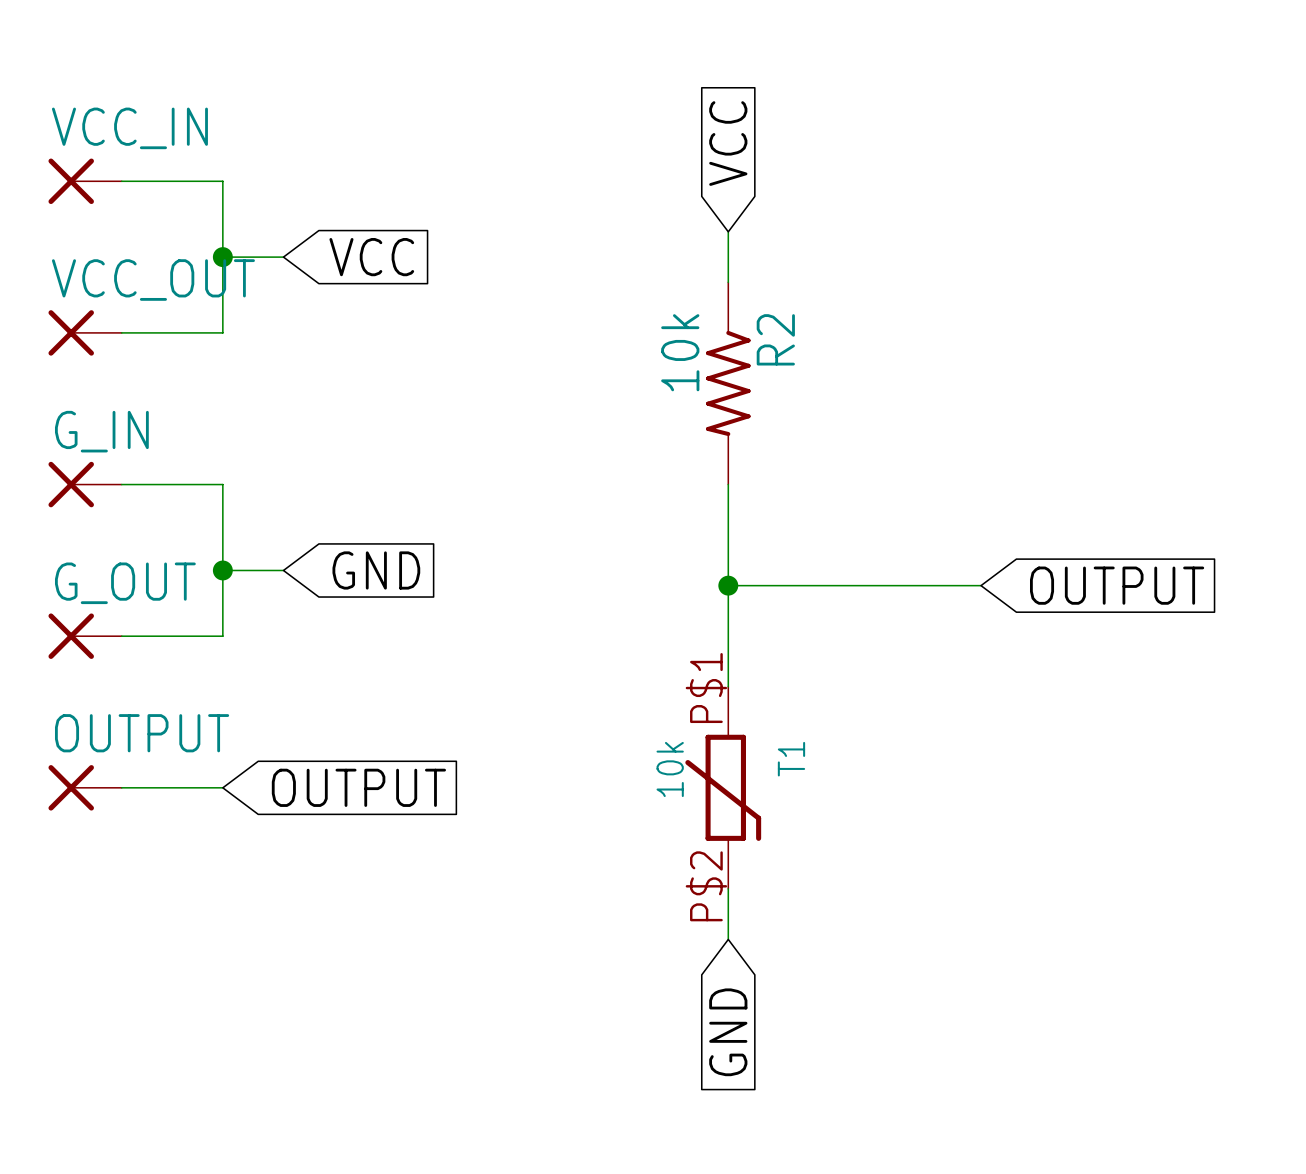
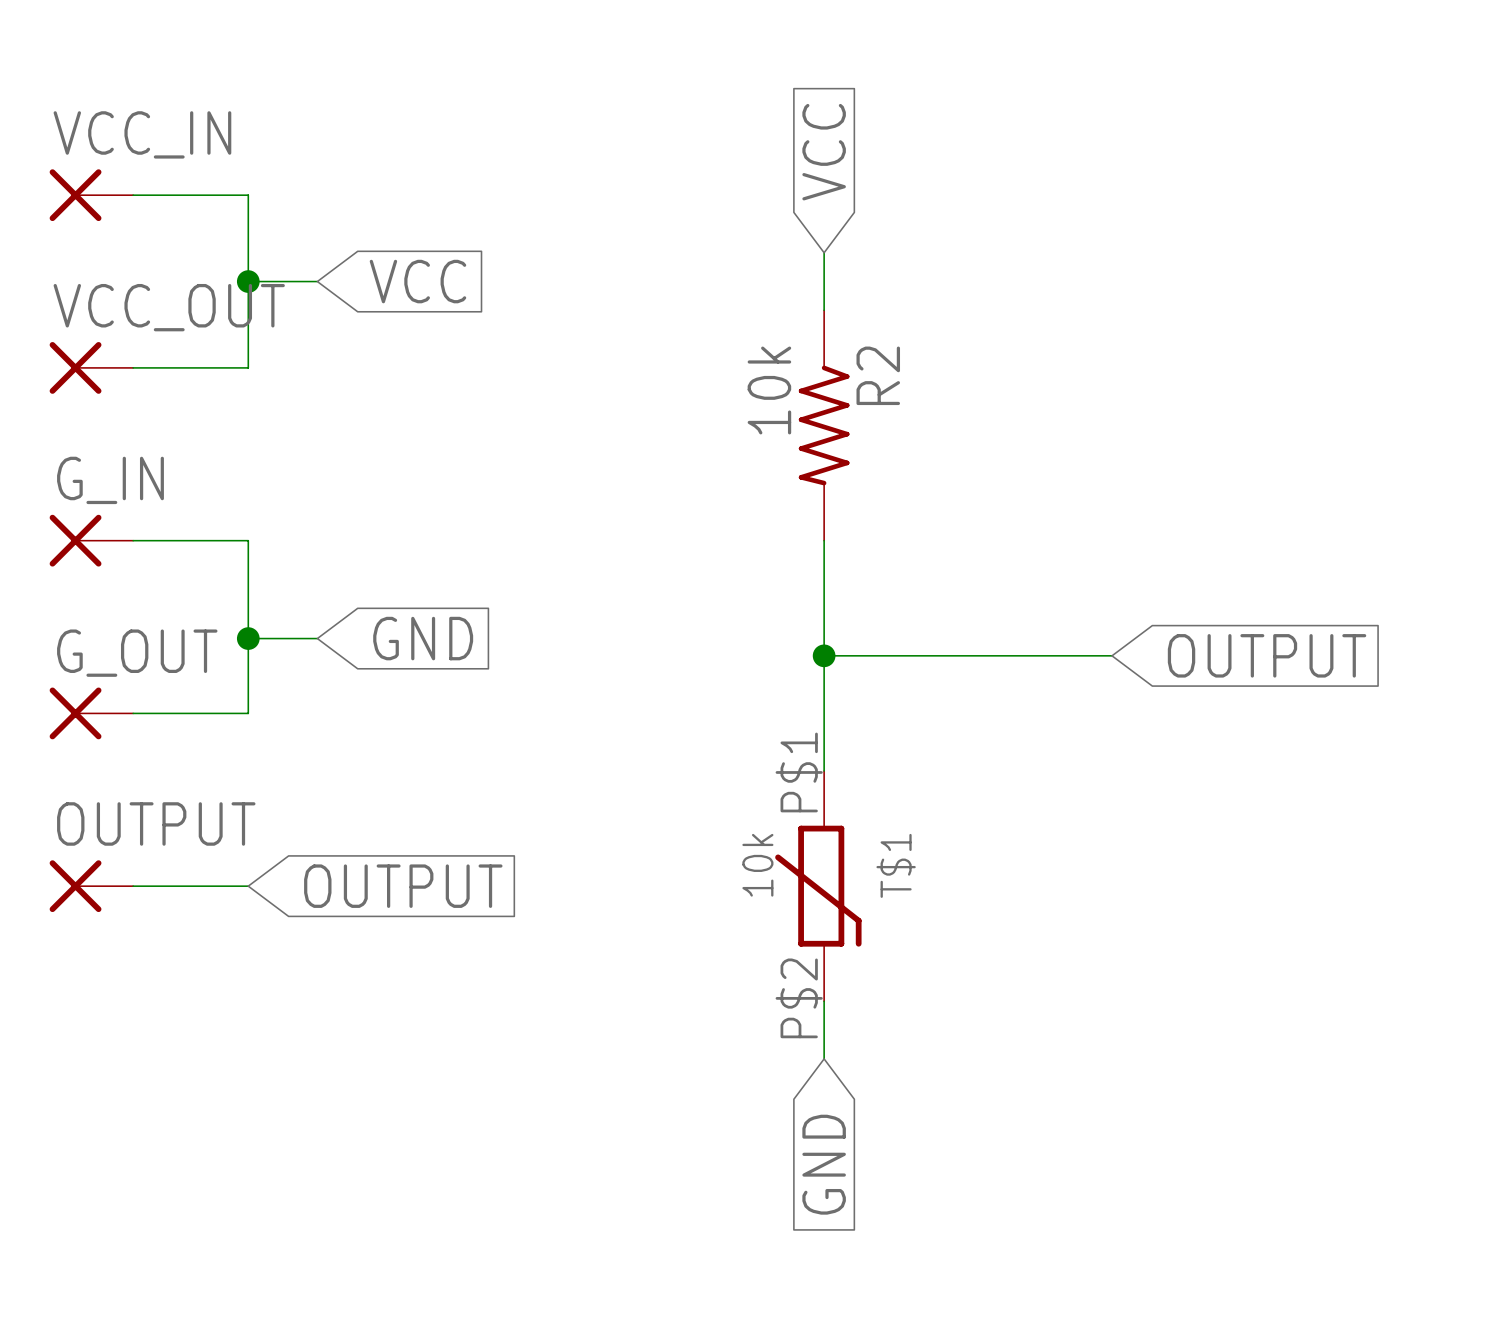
T1 name: T1 (791, 759) -> T$1 (896, 865)

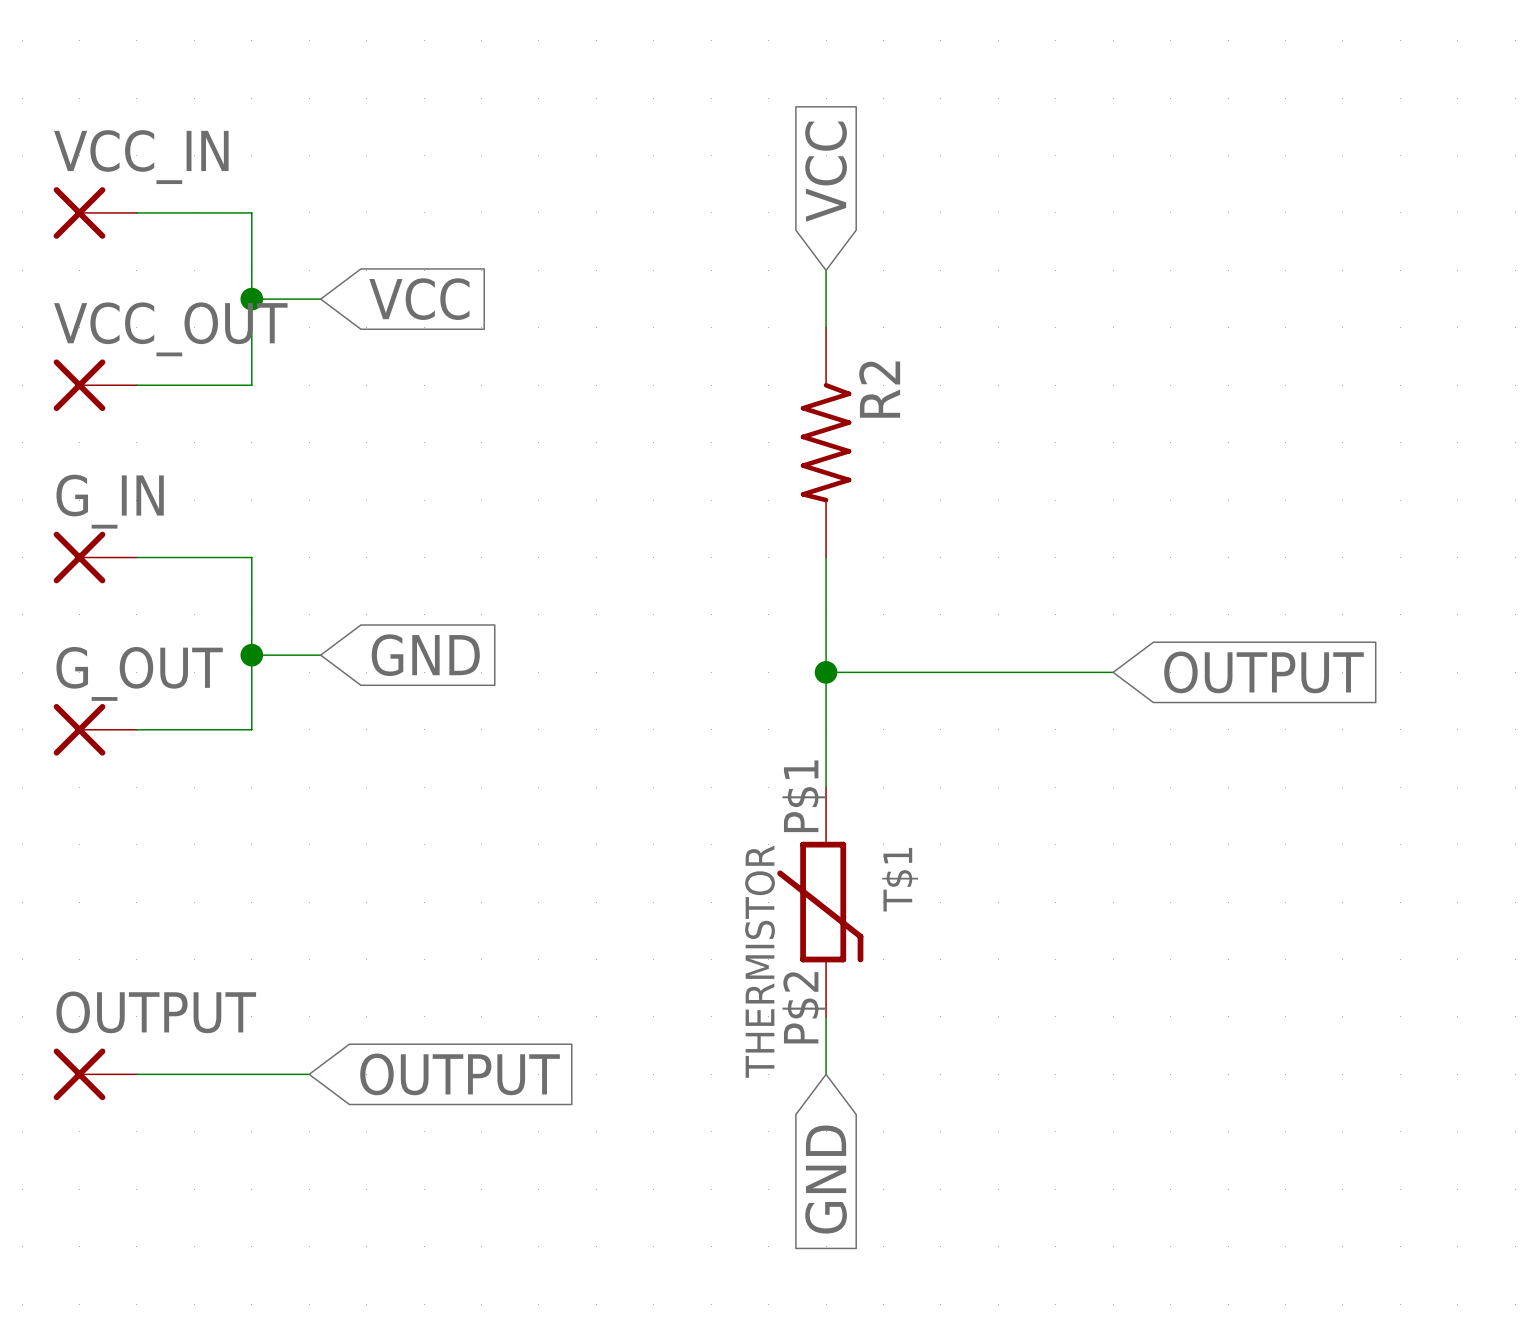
R2 value: 10k (769, 390) -> none
T$1 value: 10k (757, 865) -> THERMISTOR (760, 961)
OUTPUT position: (91, 886) -> (95, 1074)
wire: (133, 886) (248, 886) -> none
global label position: OUTPUT (403, 886) -> OUTPUT (460, 1074)
wire: none -> (136, 1074) (309, 1074)

